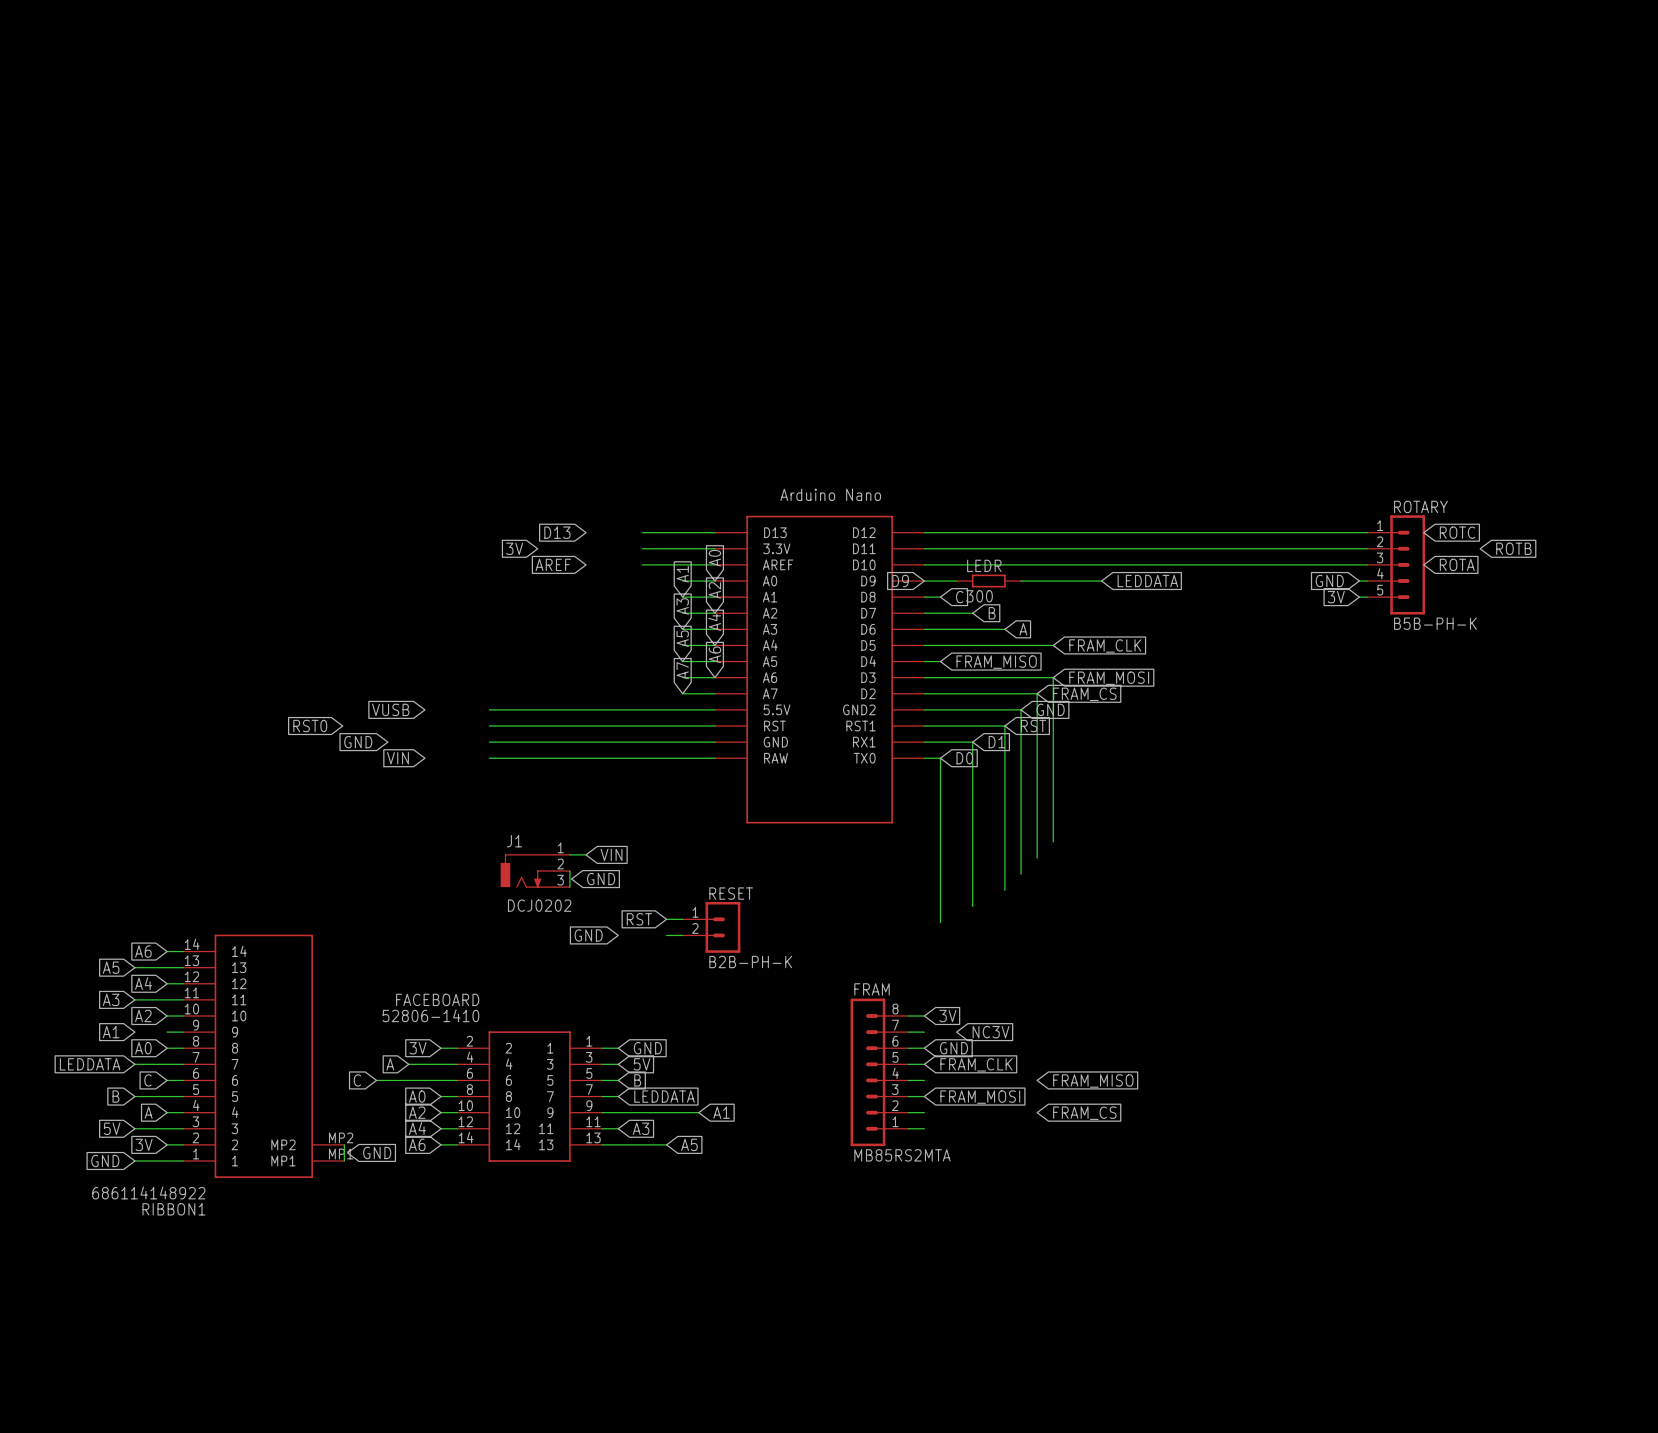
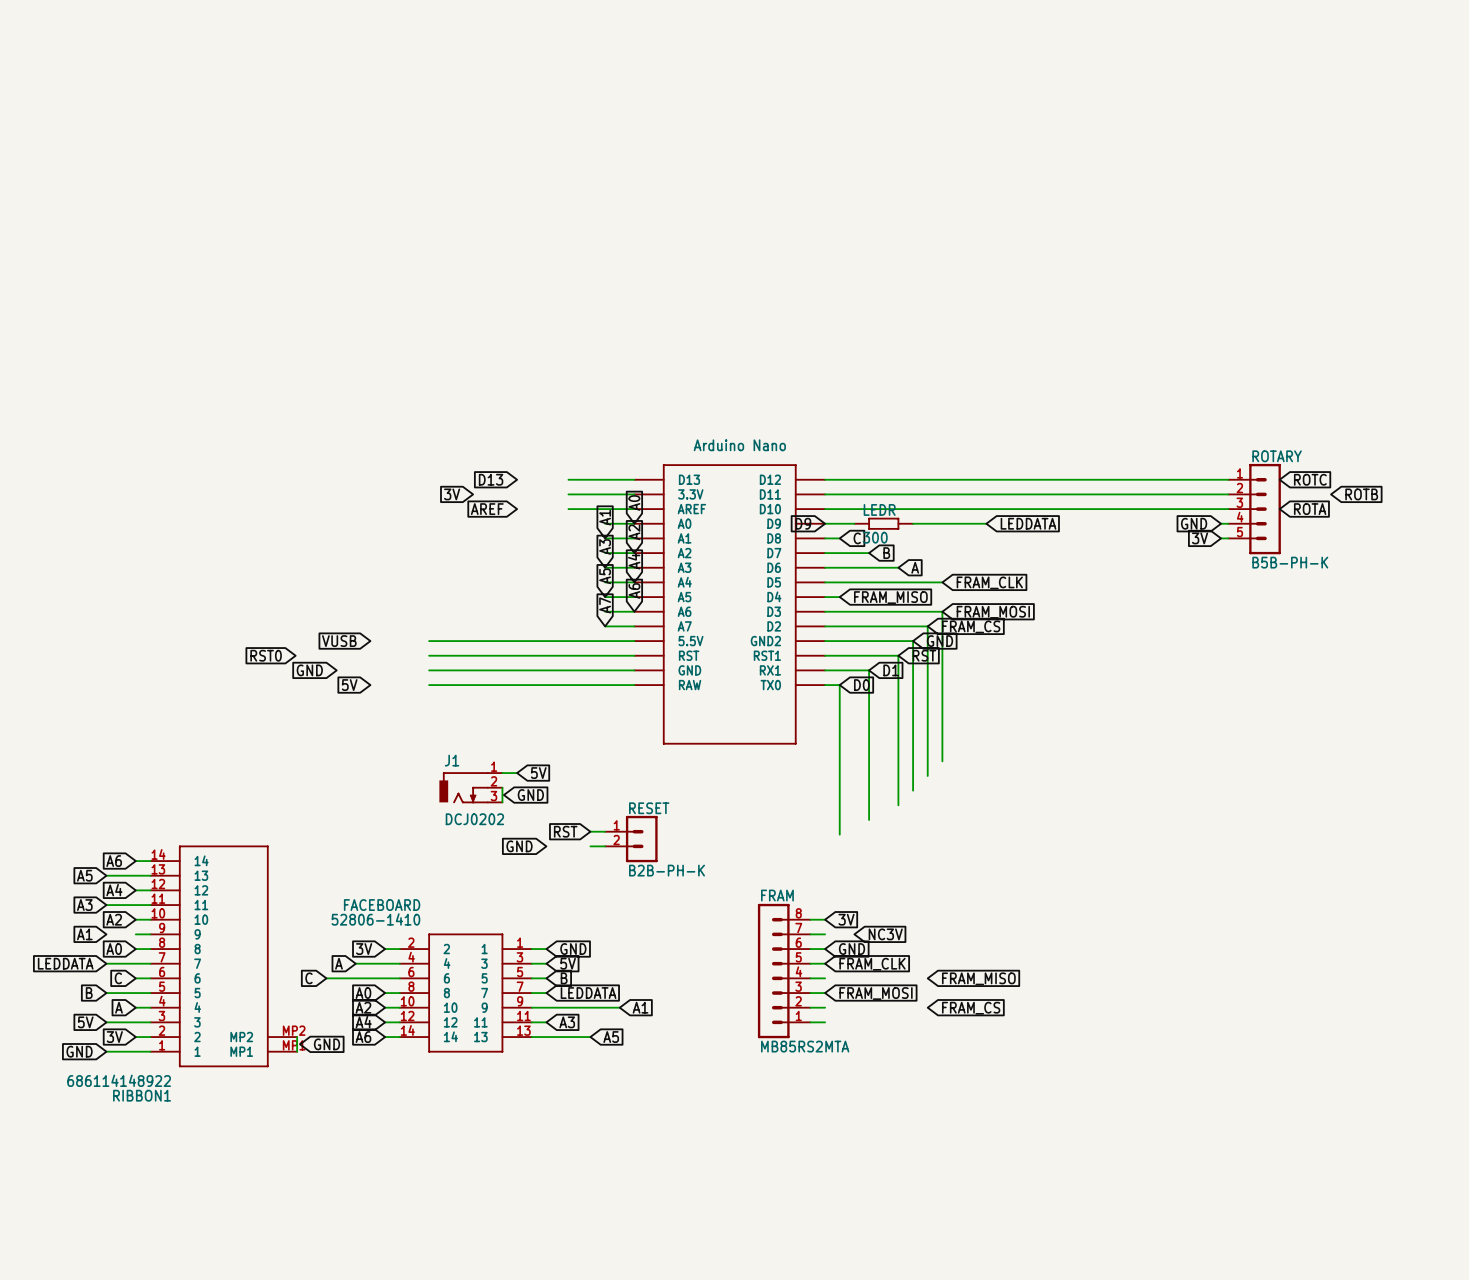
global label: VIN (397, 758) -> 5V (349, 685)
global label: VIN (611, 854) -> 5V (538, 773)

